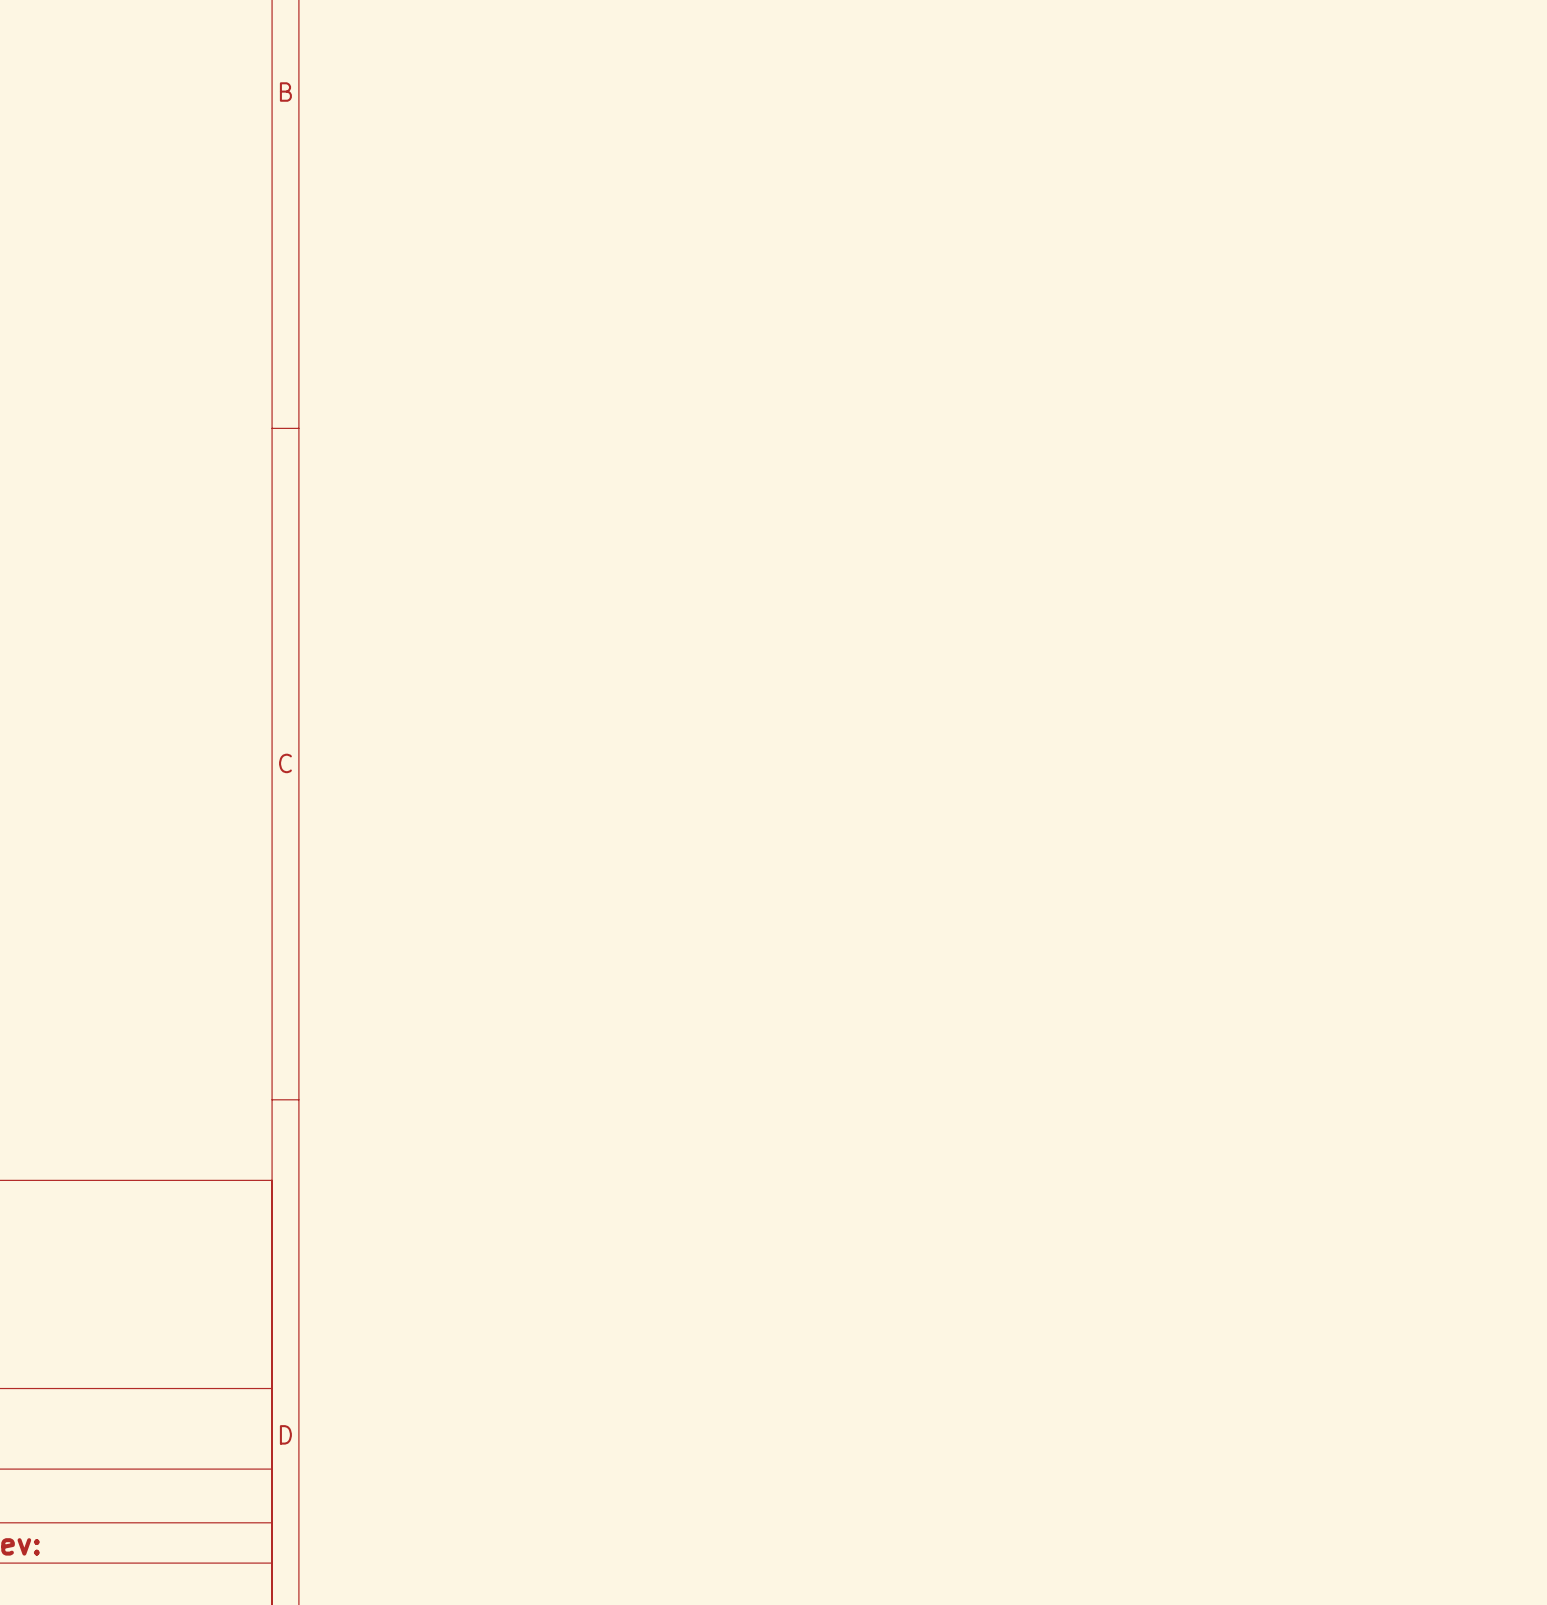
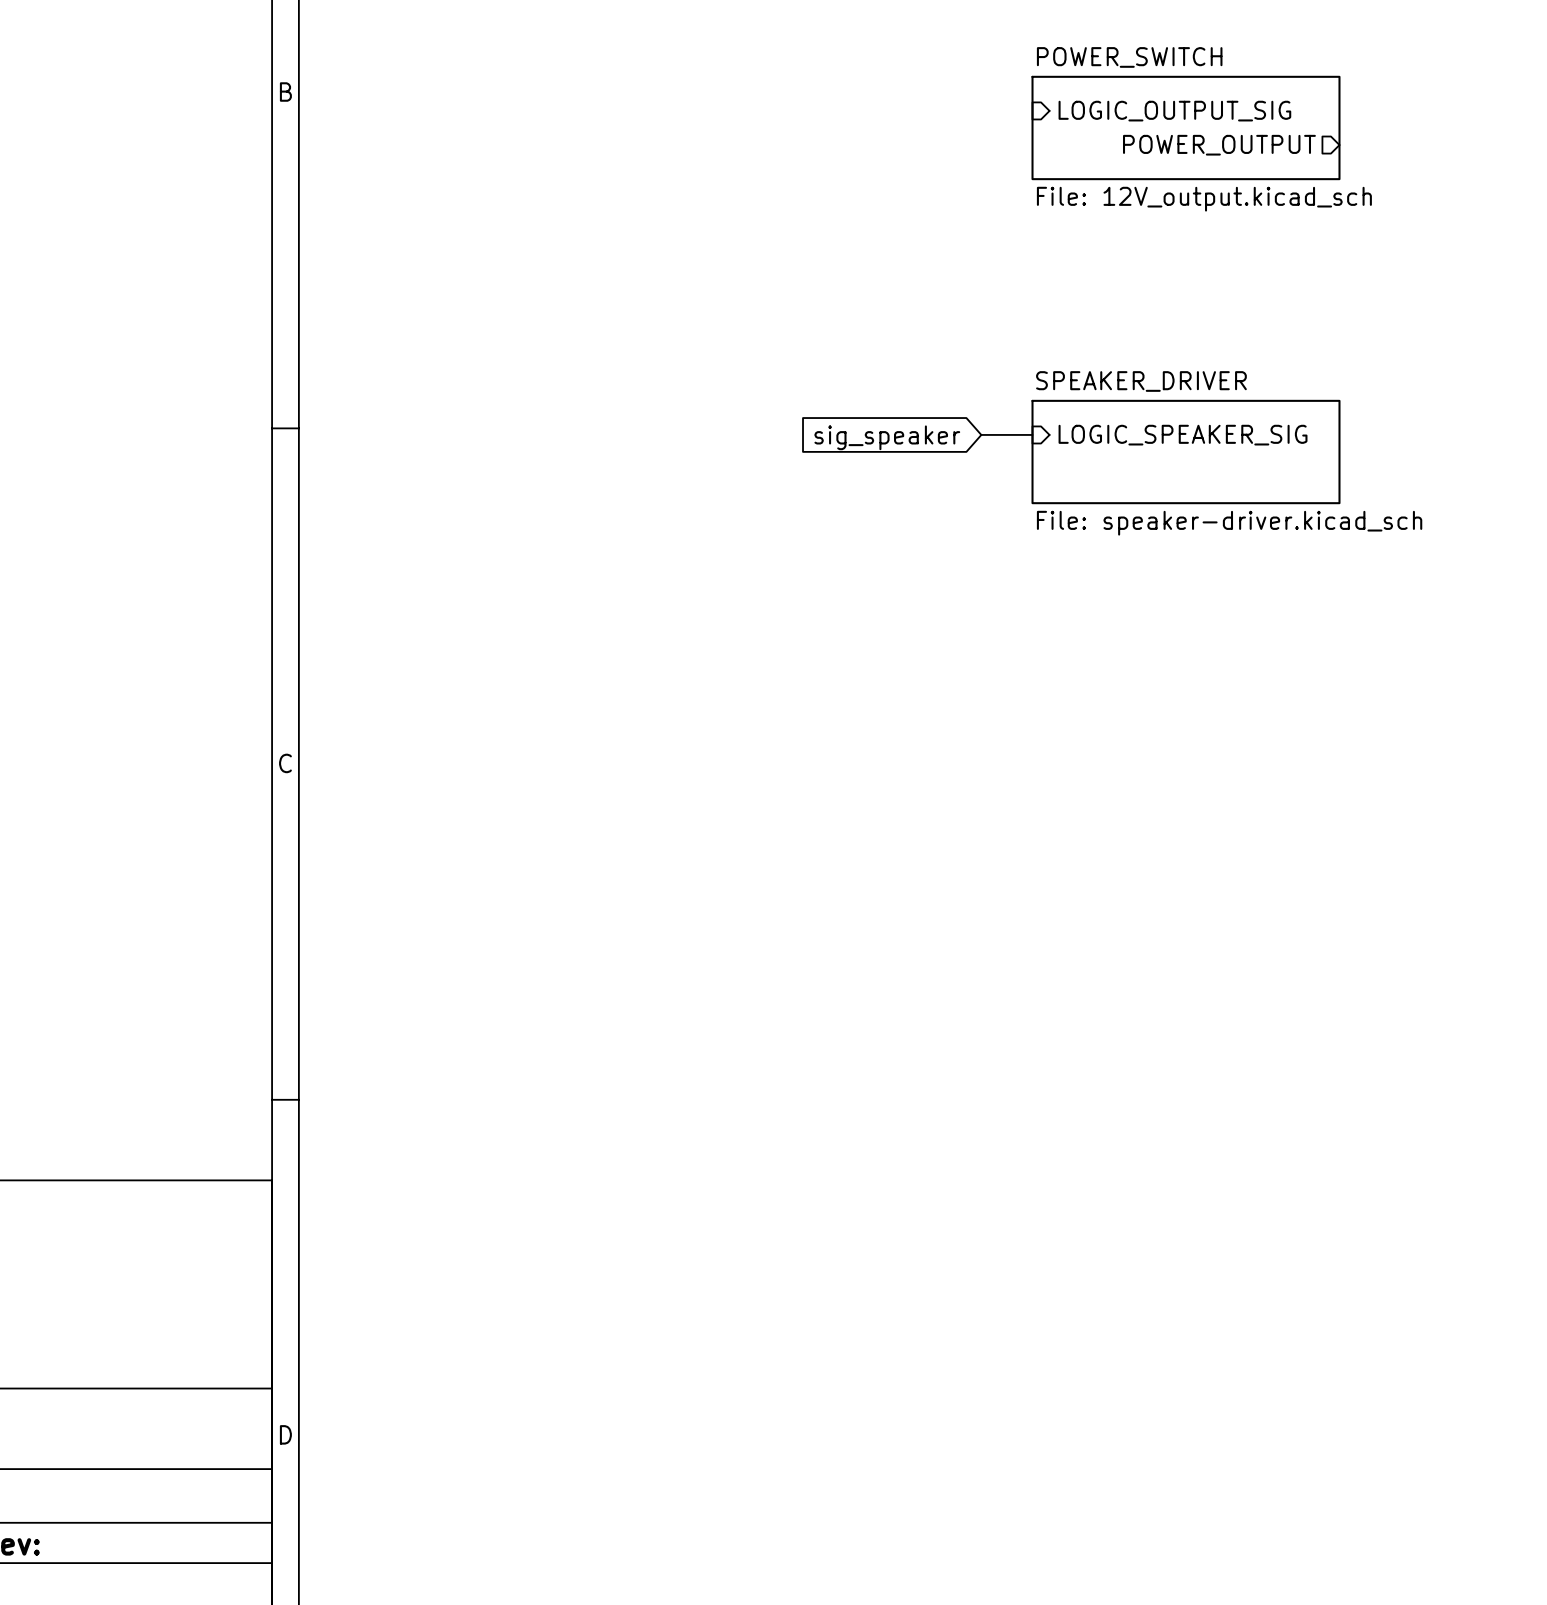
sheet pin: none -> LOGIC_OUTPUT_SIG (1174, 111)
sheet POWER_SWITCH: none -> File: 12V_output.kicad_sch (1186, 127)
sheet pin: none -> POWER_OUTPUT (1219, 145)
wire: none -> (981, 434) (1032, 434)
sheet pin: none -> LOGIC_SPEAKER_SIG (1183, 435)
global label: none -> sig_speaker (887, 437)
sheet SPEAKER_DRIVER: none -> File: speaker-driver.kicad_sch (1186, 452)

